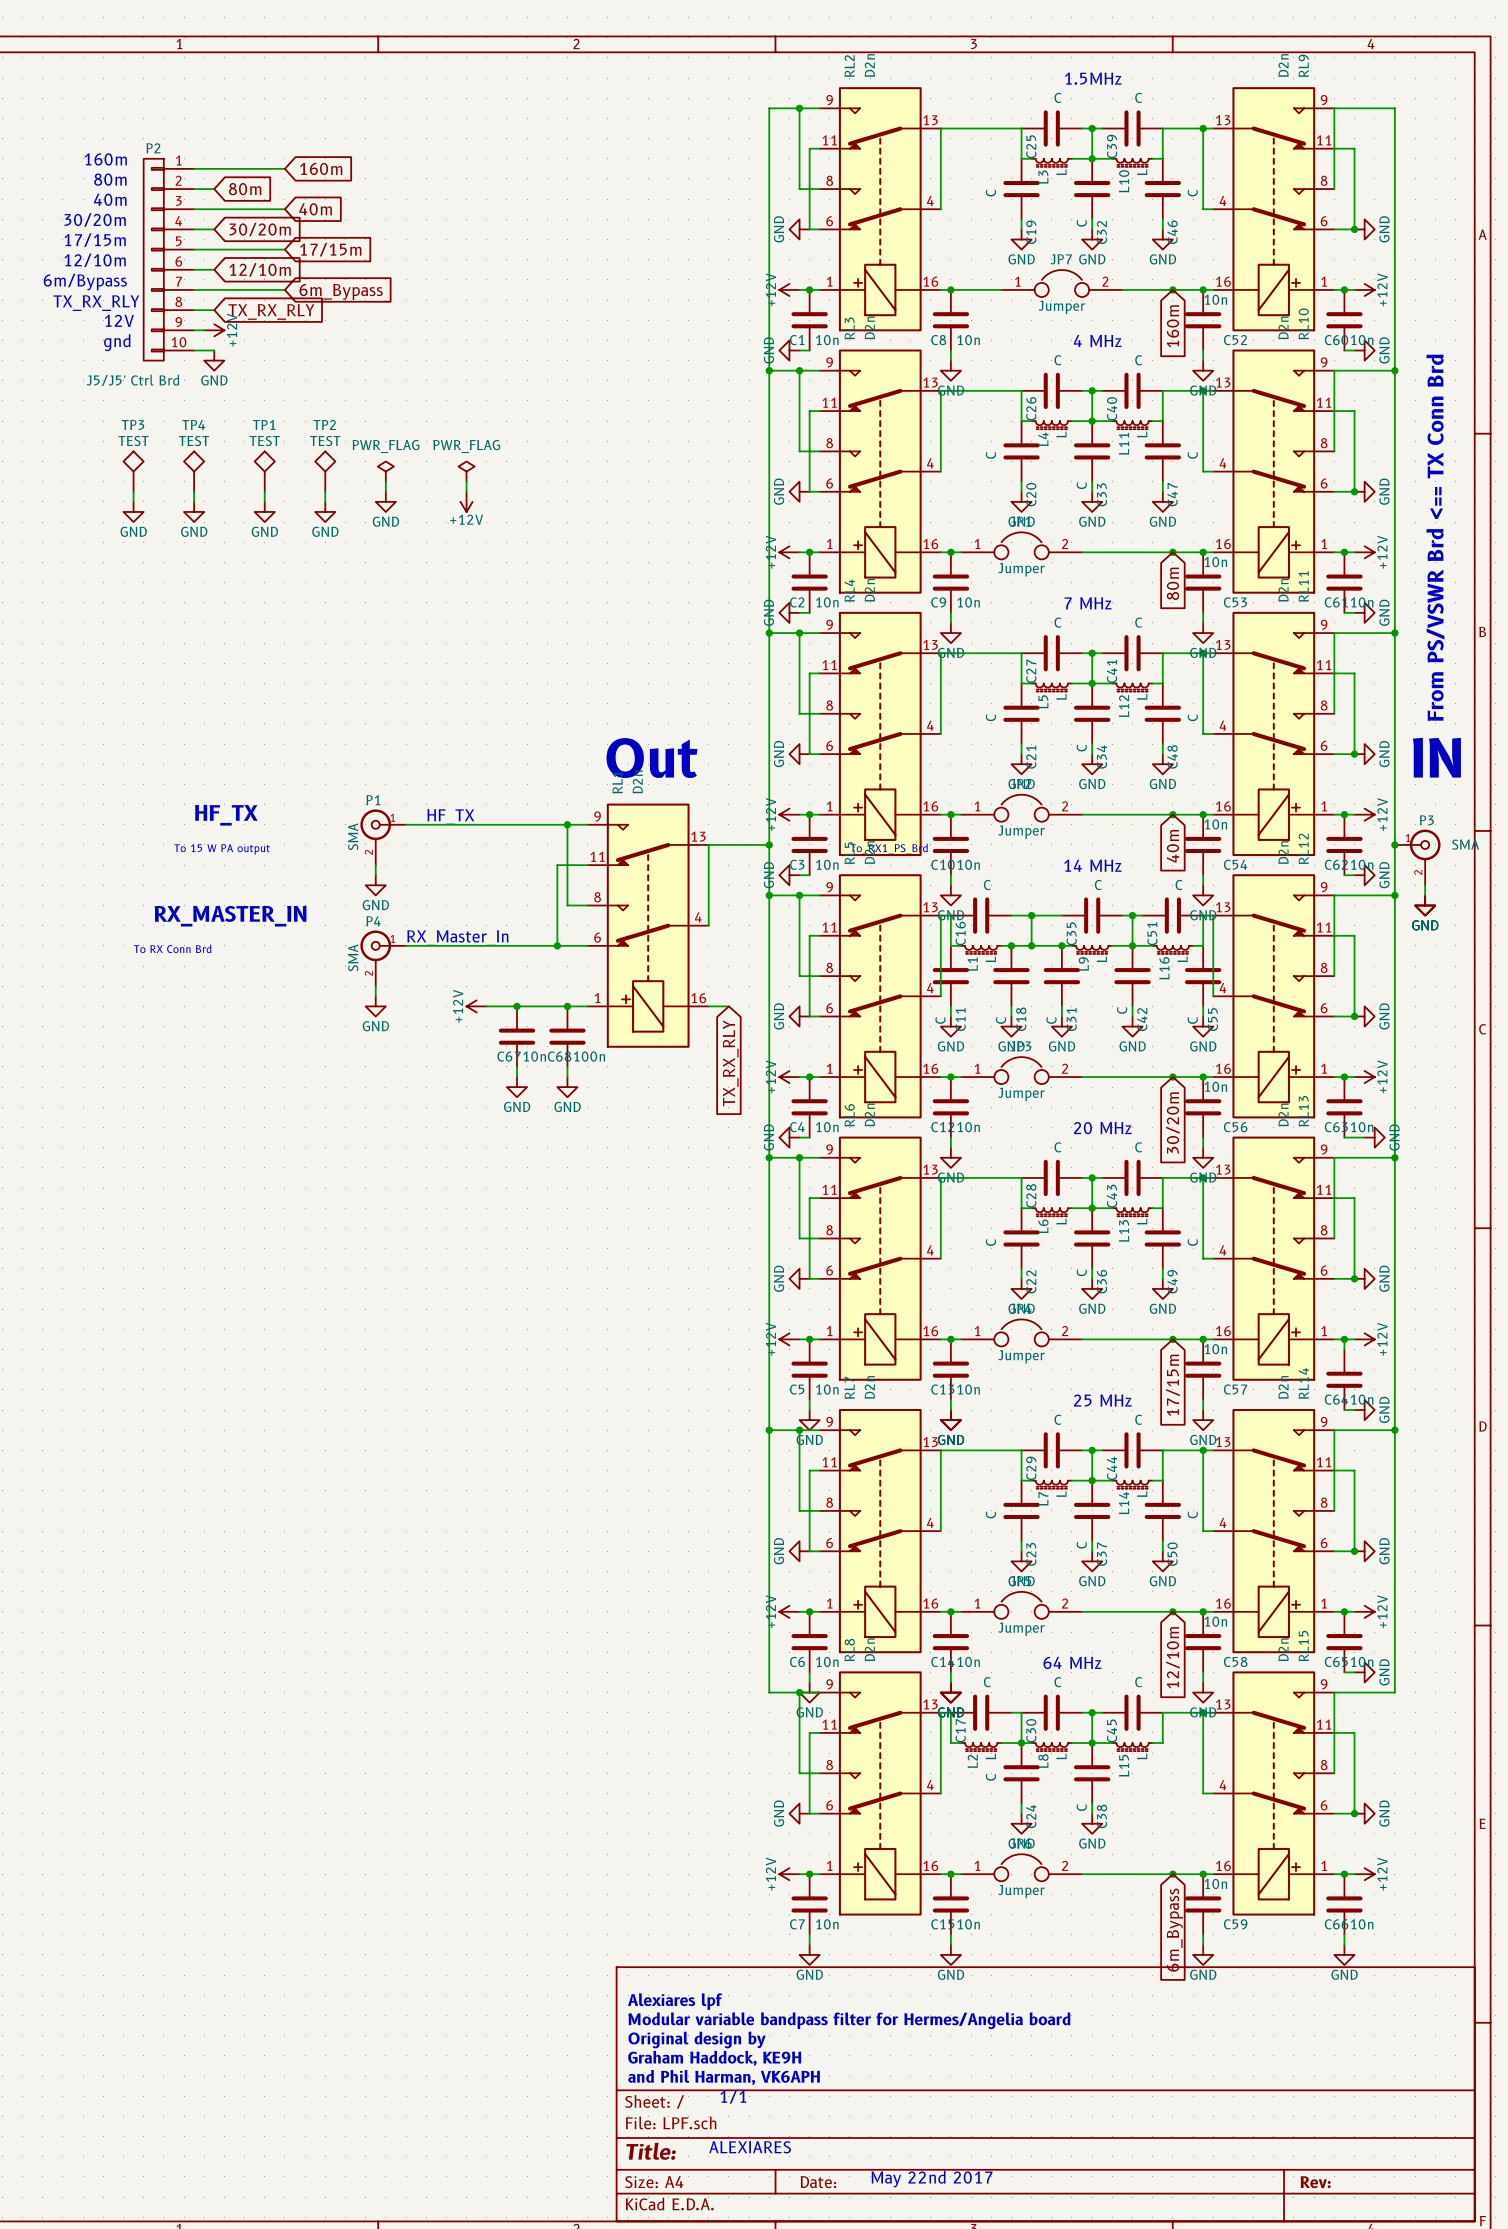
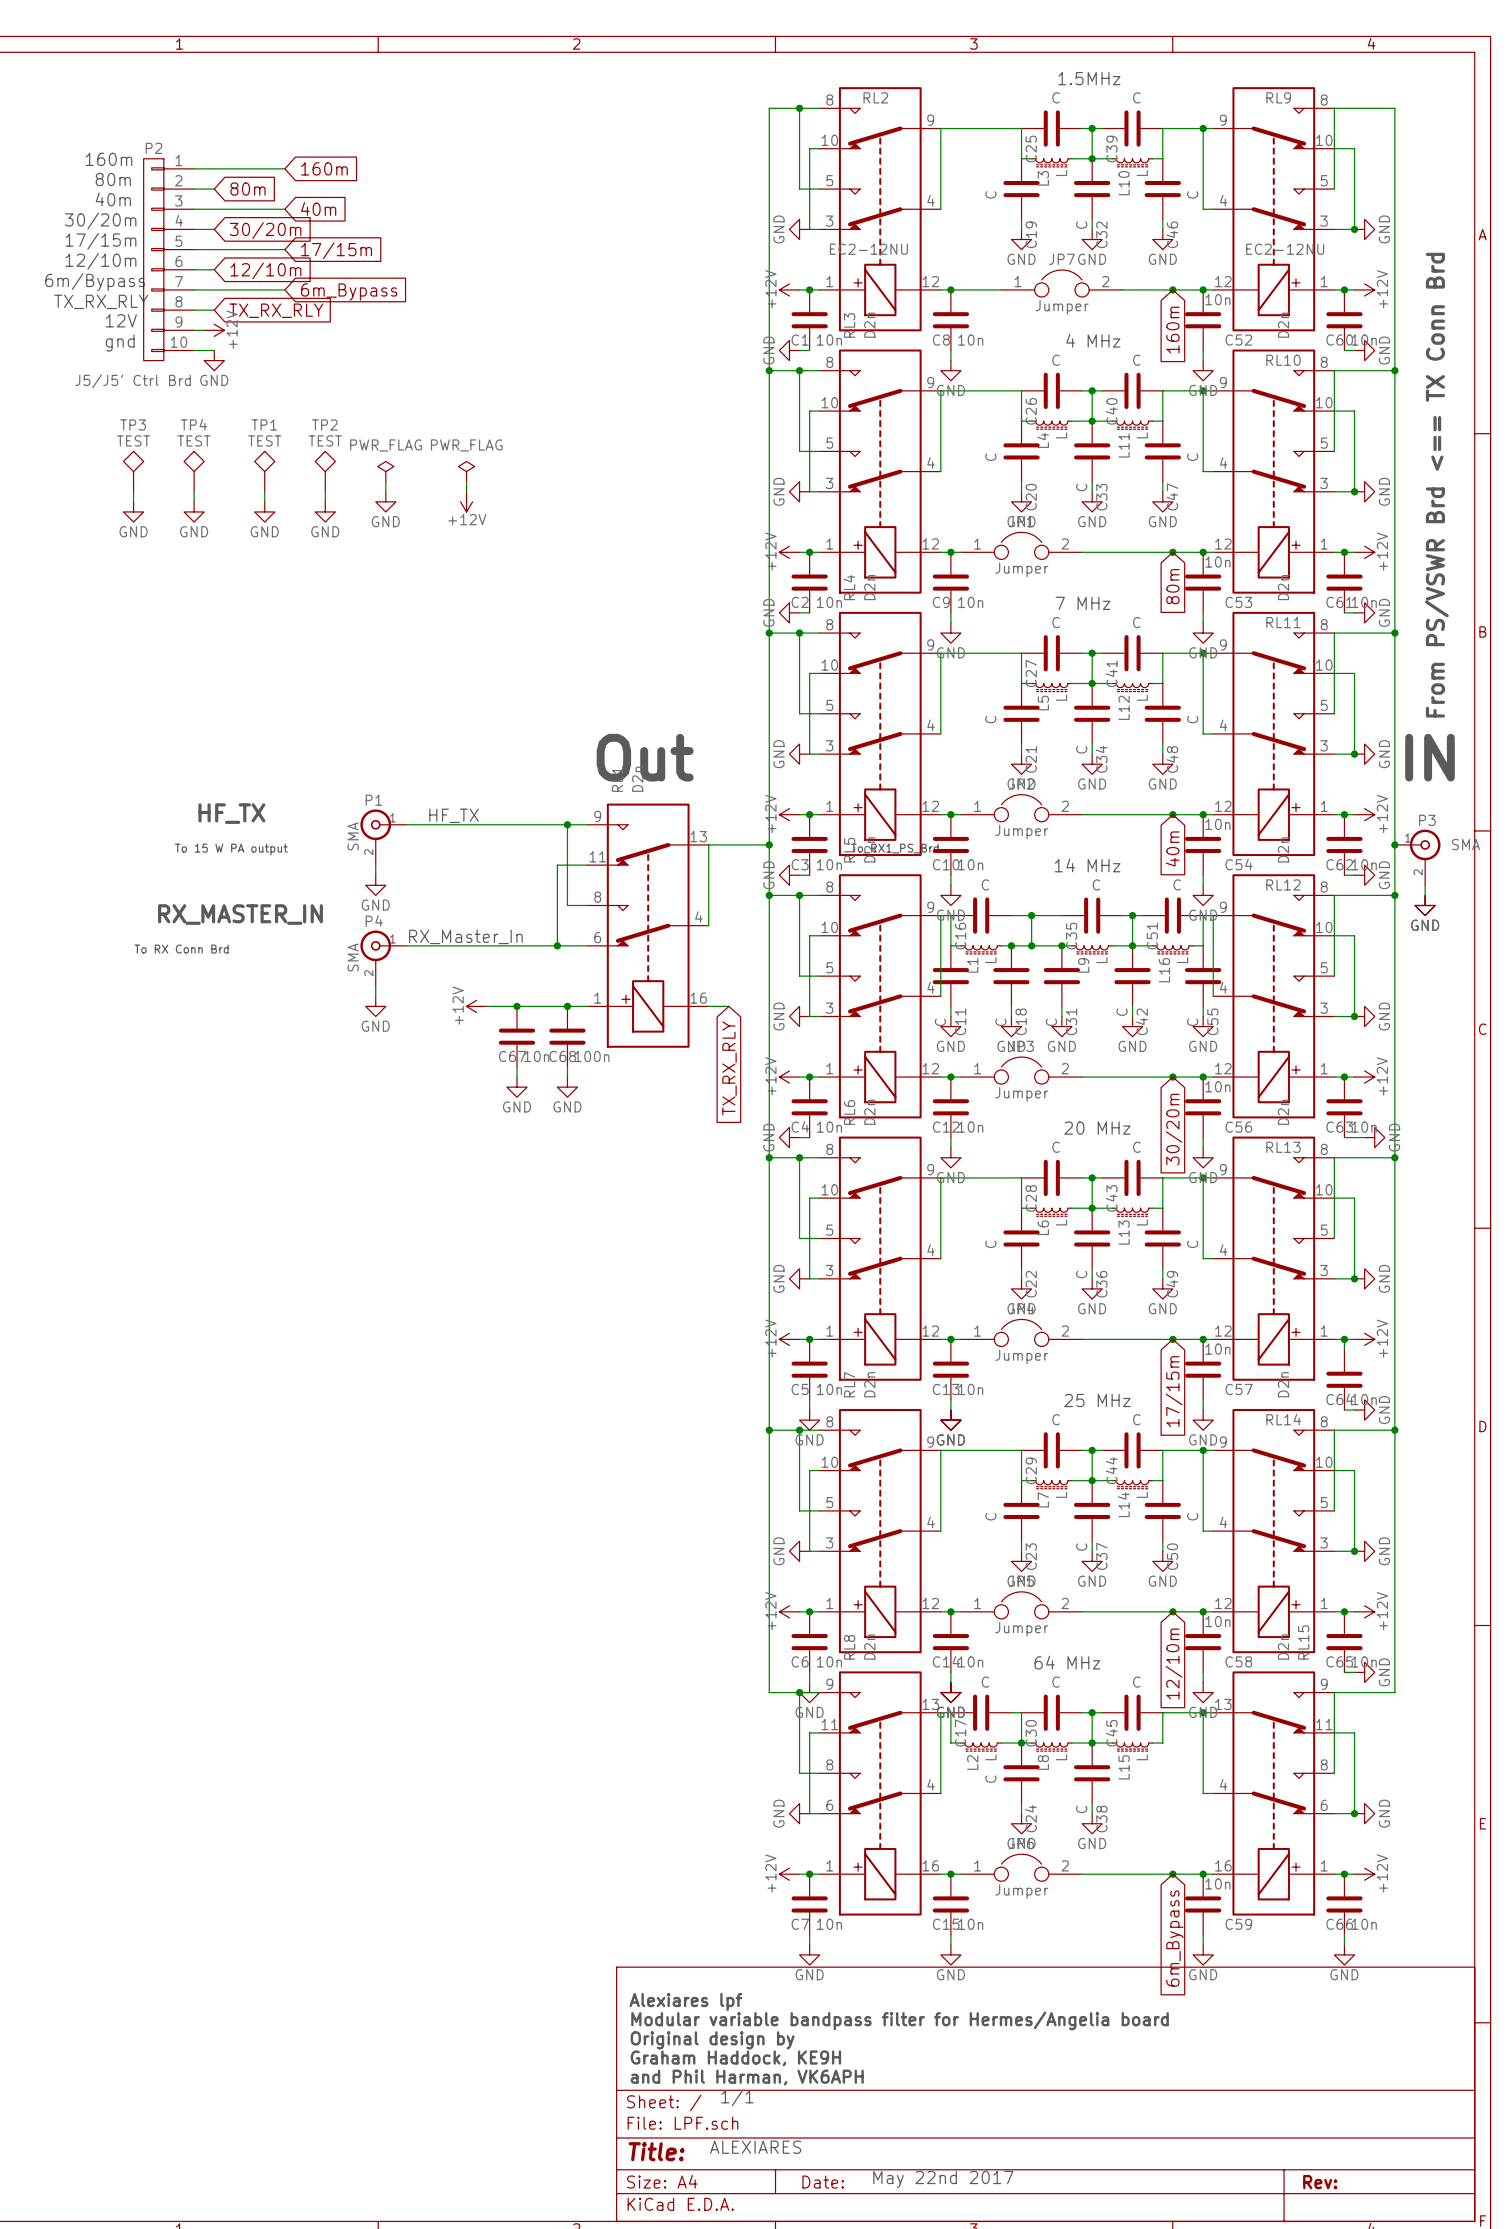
RL2 value: D2n (869, 65) -> EC2-12NU (868, 249)
RL9 value: D2n (1283, 65) -> EC2-12NU (1285, 249)
RL9 name rotation: 0° (1303, 65) -> 90° clockwise (1278, 97)
RL9 name position: RL9 (1303, 65) -> RL9 (1278, 97)
RL2 name rotation: 0° (849, 66) -> 90° clockwise (875, 97)
RL2 name position: RL2 (849, 66) -> RL2 (875, 97)
RL2 pin number: 9 (829, 100) -> 8 (829, 100)
RL9 pin number: 9 (1324, 100) -> 8 (1324, 100)
RL2 pin number: 13 (930, 120) -> 9 (930, 120)
RL9 pin number: 13 (1223, 120) -> 9 (1223, 120)
RL2 pin number: 11 (829, 140) -> 10 (829, 140)
RL9 pin number: 11 (1324, 140) -> 10 (1324, 140)
RL2 pin number: 8 (829, 180) -> 5 (829, 180)
RL9 pin number: 8 (1324, 180) -> 5 (1324, 180)
RL2 pin number: 6 (829, 221) -> 3 (829, 221)
RL9 pin number: 6 (1324, 221) -> 3 (1324, 221)
RL2 pin number: 16 (930, 281) -> 12 (930, 281)
RL9 pin number: 16 (1223, 281) -> 12 (1223, 281)
RL10 name rotation: 0° (1303, 323) -> 90° clockwise (1283, 360)
RL10 name position: RL10 (1303, 323) -> RL10 (1283, 360)
RL3 pin number: 9 (829, 362) -> 8 (829, 362)
RL10 pin number: 9 (1324, 362) -> 8 (1324, 362)
RL3 pin number: 13 (930, 382) -> 9 (930, 382)
RL10 pin number: 13 (1223, 382) -> 9 (1223, 382)
RL3 pin number: 11 (829, 402) -> 10 (829, 402)
RL10 pin number: 11 (1324, 402) -> 10 (1324, 402)
RL3 pin number: 8 (829, 443) -> 5 (829, 443)
RL10 pin number: 8 (1324, 443) -> 5 (1324, 443)
RL3 pin number: 6 (829, 483) -> 3 (829, 483)
RL10 pin number: 6 (1324, 483) -> 3 (1324, 483)
RL3 pin number: 16 (930, 544) -> 12 (930, 544)
RL10 pin number: 16 (1223, 544) -> 12 (1223, 544)
RL11 name rotation: 0° (1303, 586) -> 90° clockwise (1283, 622)
RL11 name position: RL11 (1303, 586) -> RL11 (1283, 622)
RL4 pin number: 9 (829, 624) -> 8 (829, 624)
RL11 pin number: 9 (1324, 624) -> 8 (1324, 624)
RL4 pin number: 13 (930, 644) -> 9 (930, 644)
RL11 pin number: 13 (1223, 644) -> 9 (1223, 644)
RL4 pin number: 11 (829, 665) -> 10 (829, 665)
RL11 pin number: 11 (1324, 665) -> 10 (1324, 665)
RL4 pin number: 8 (829, 705) -> 5 (829, 705)
RL11 pin number: 8 (1324, 705) -> 5 (1324, 705)
RL4 pin number: 6 (829, 745) -> 3 (829, 745)
RL11 pin number: 6 (1324, 745) -> 3 (1324, 745)
RL4 pin number: 16 (930, 806) -> 12 (930, 806)
RL11 pin number: 16 (1223, 806) -> 12 (1223, 806)
RL12 name rotation: 0° (1303, 848) -> 90° clockwise (1283, 884)
RL12 name position: RL12 (1303, 848) -> RL12 (1283, 884)
RL5 pin number: 9 (829, 887) -> 8 (829, 887)
RL12 pin number: 9 (1324, 887) -> 8 (1324, 887)
RL5 pin number: 13 (930, 907) -> 9 (930, 907)
RL12 pin number: 13 (1223, 907) -> 9 (1223, 907)
RL5 pin number: 11 (829, 927) -> 10 (829, 927)
RL12 pin number: 11 (1324, 927) -> 10 (1324, 927)
RL5 pin number: 8 (829, 967) -> 5 (829, 967)
RL12 pin number: 8 (1324, 967) -> 5 (1324, 967)
RL5 pin number: 6 (829, 1008) -> 3 (829, 1008)
RL12 pin number: 6 (1324, 1008) -> 3 (1324, 1008)
RL5 pin number: 16 (930, 1068) -> 12 (930, 1068)
RL12 pin number: 16 (1223, 1068) -> 12 (1223, 1068)
RL13 name rotation: 0° (1303, 1111) -> 90° clockwise (1283, 1147)
RL13 name position: RL13 (1303, 1111) -> RL13 (1283, 1147)
RL6 pin number: 9 (829, 1149) -> 8 (829, 1149)
RL13 pin number: 9 (1324, 1149) -> 8 (1324, 1149)
RL6 pin number: 13 (930, 1169) -> 9 (930, 1169)
RL13 pin number: 13 (1223, 1169) -> 9 (1223, 1169)
RL6 pin number: 11 (829, 1189) -> 10 (829, 1189)
RL13 pin number: 11 (1324, 1189) -> 10 (1324, 1189)
RL6 pin number: 8 (829, 1230) -> 5 (829, 1230)
RL13 pin number: 8 (1324, 1230) -> 5 (1324, 1230)
RL6 pin number: 6 (829, 1270) -> 3 (829, 1270)
RL13 pin number: 6 (1324, 1270) -> 3 (1324, 1270)
RL6 pin number: 16 (930, 1331) -> 12 (930, 1331)
RL13 pin number: 16 (1223, 1331) -> 12 (1223, 1331)
RL14 name rotation: 0° (1303, 1383) -> 90° clockwise (1283, 1419)
RL14 name position: RL14 (1303, 1383) -> RL14 (1283, 1419)
RL7 pin number: 9 (829, 1421) -> 8 (829, 1421)
RL14 pin number: 9 (1324, 1421) -> 8 (1324, 1421)
RL7 pin number: 13 (930, 1442) -> 9 (930, 1442)
RL14 pin number: 13 (1223, 1442) -> 9 (1223, 1442)
RL7 pin number: 11 (829, 1462) -> 10 (829, 1462)
RL14 pin number: 11 (1324, 1462) -> 10 (1324, 1462)
RL7 pin number: 8 (829, 1502) -> 5 (829, 1502)
RL14 pin number: 8 (1324, 1502) -> 5 (1324, 1502)
RL7 pin number: 6 (829, 1543) -> 3 (829, 1542)
RL14 pin number: 6 (1324, 1543) -> 3 (1324, 1542)
RL7 pin number: 16 (930, 1603) -> 12 (930, 1603)
RL14 pin number: 16 (1223, 1603) -> 12 (1223, 1603)

